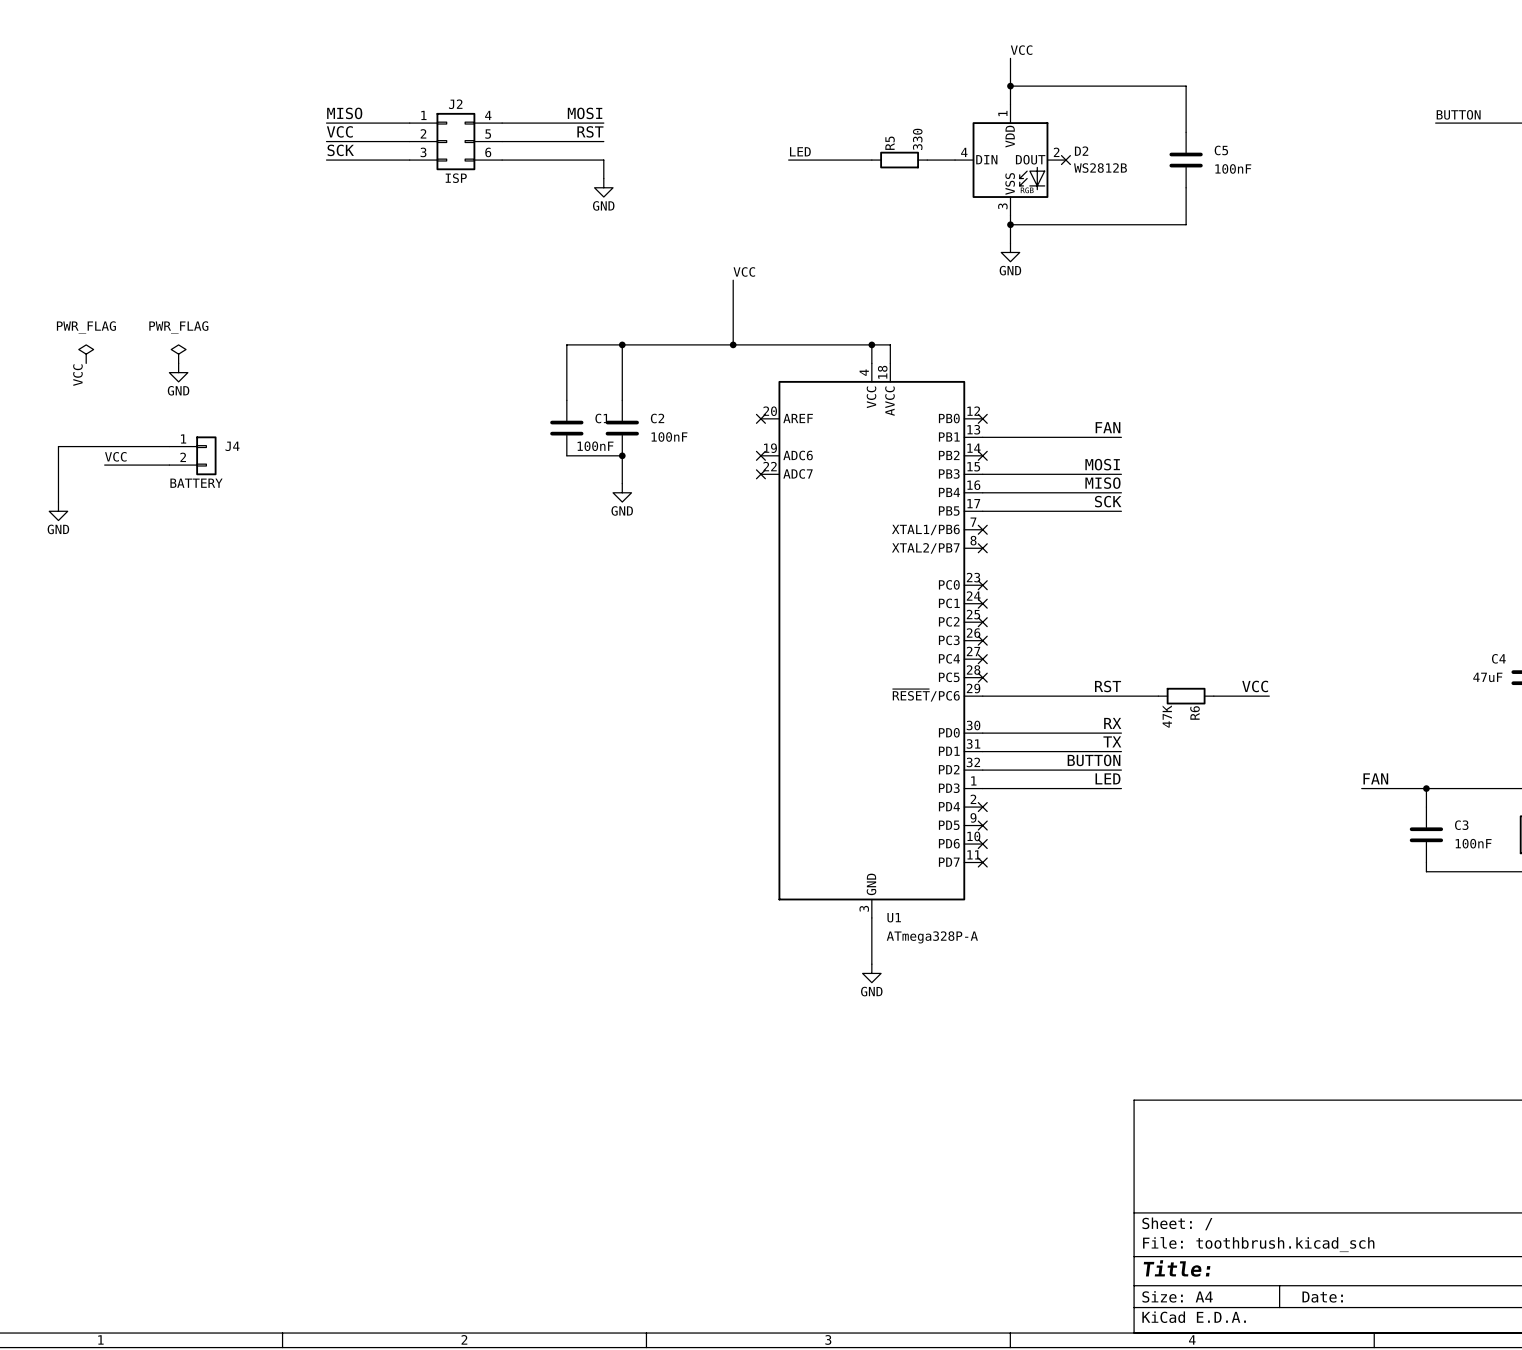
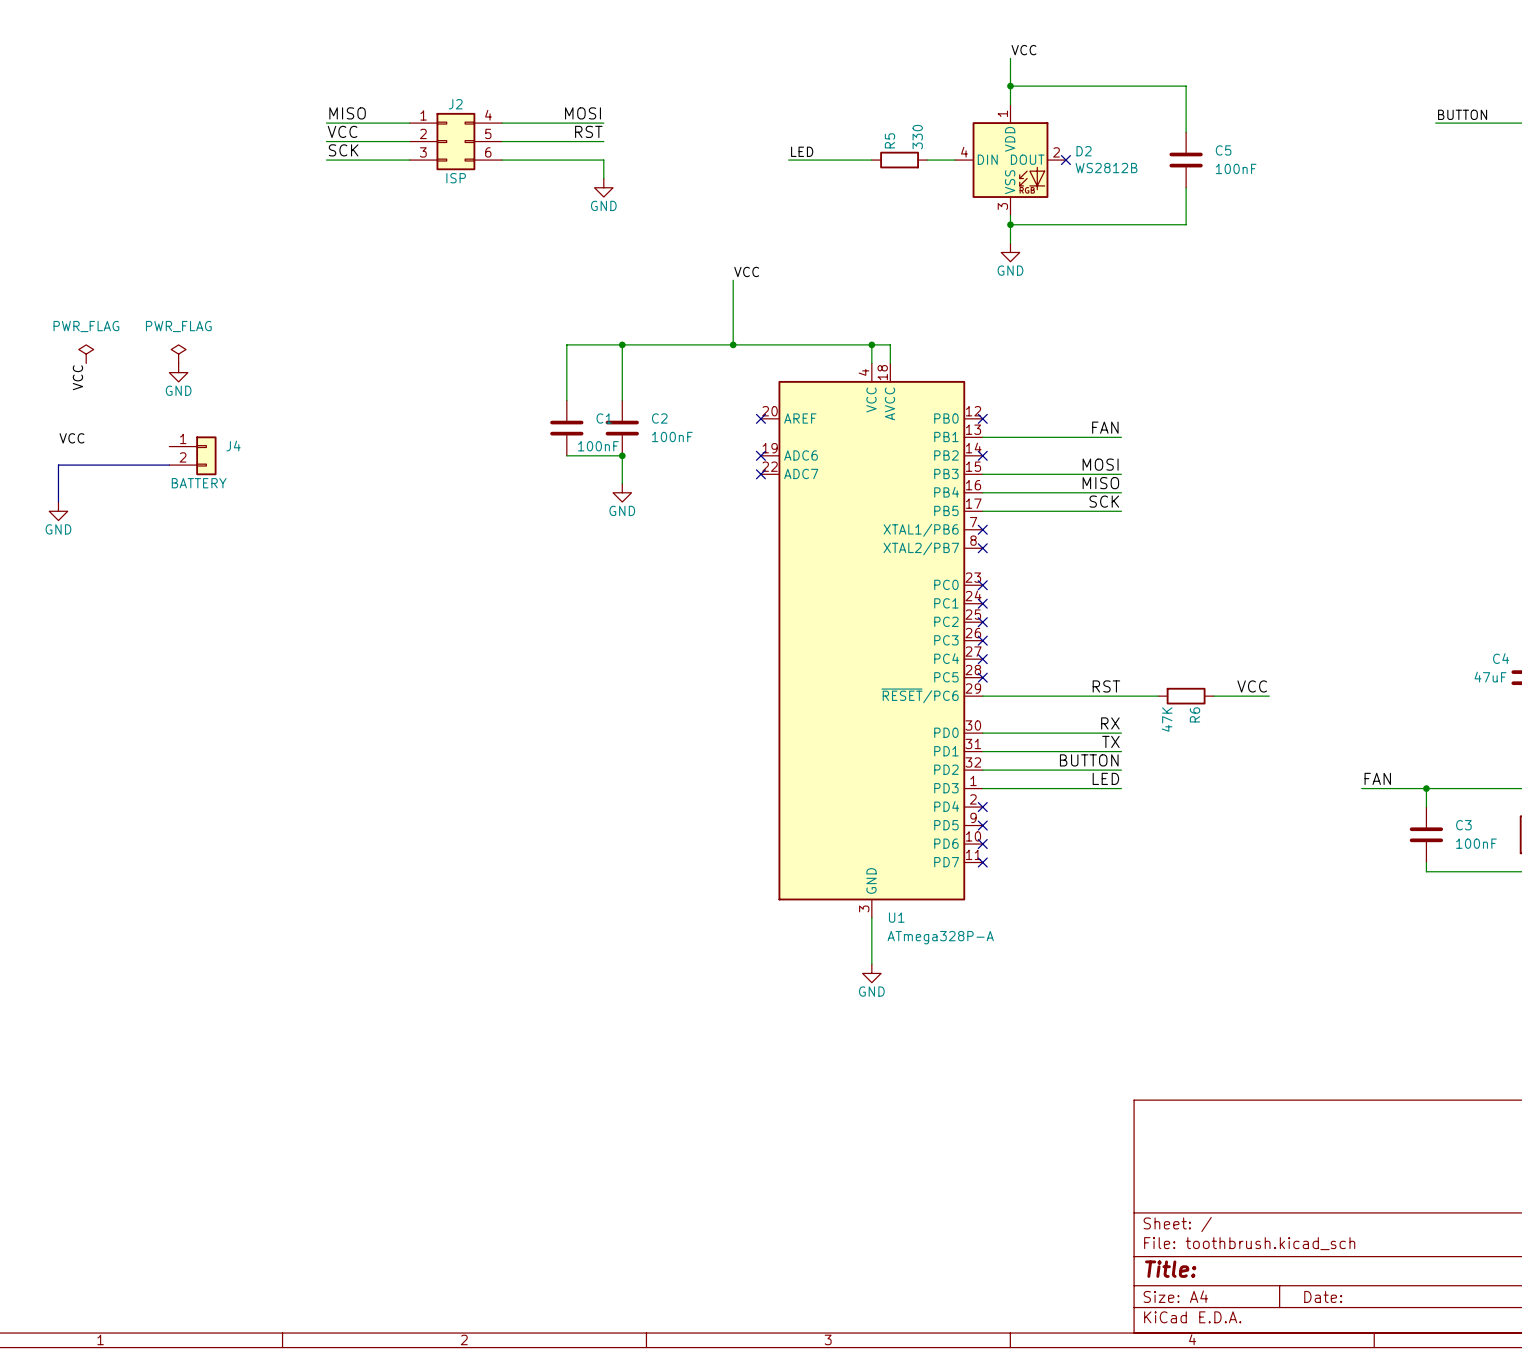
wire: (169, 446) (58, 446) (58, 502) -> none
label position: VCC (115, 456) -> VCC (71, 438)
bus: none -> (169, 465) (58, 465) (58, 502)

